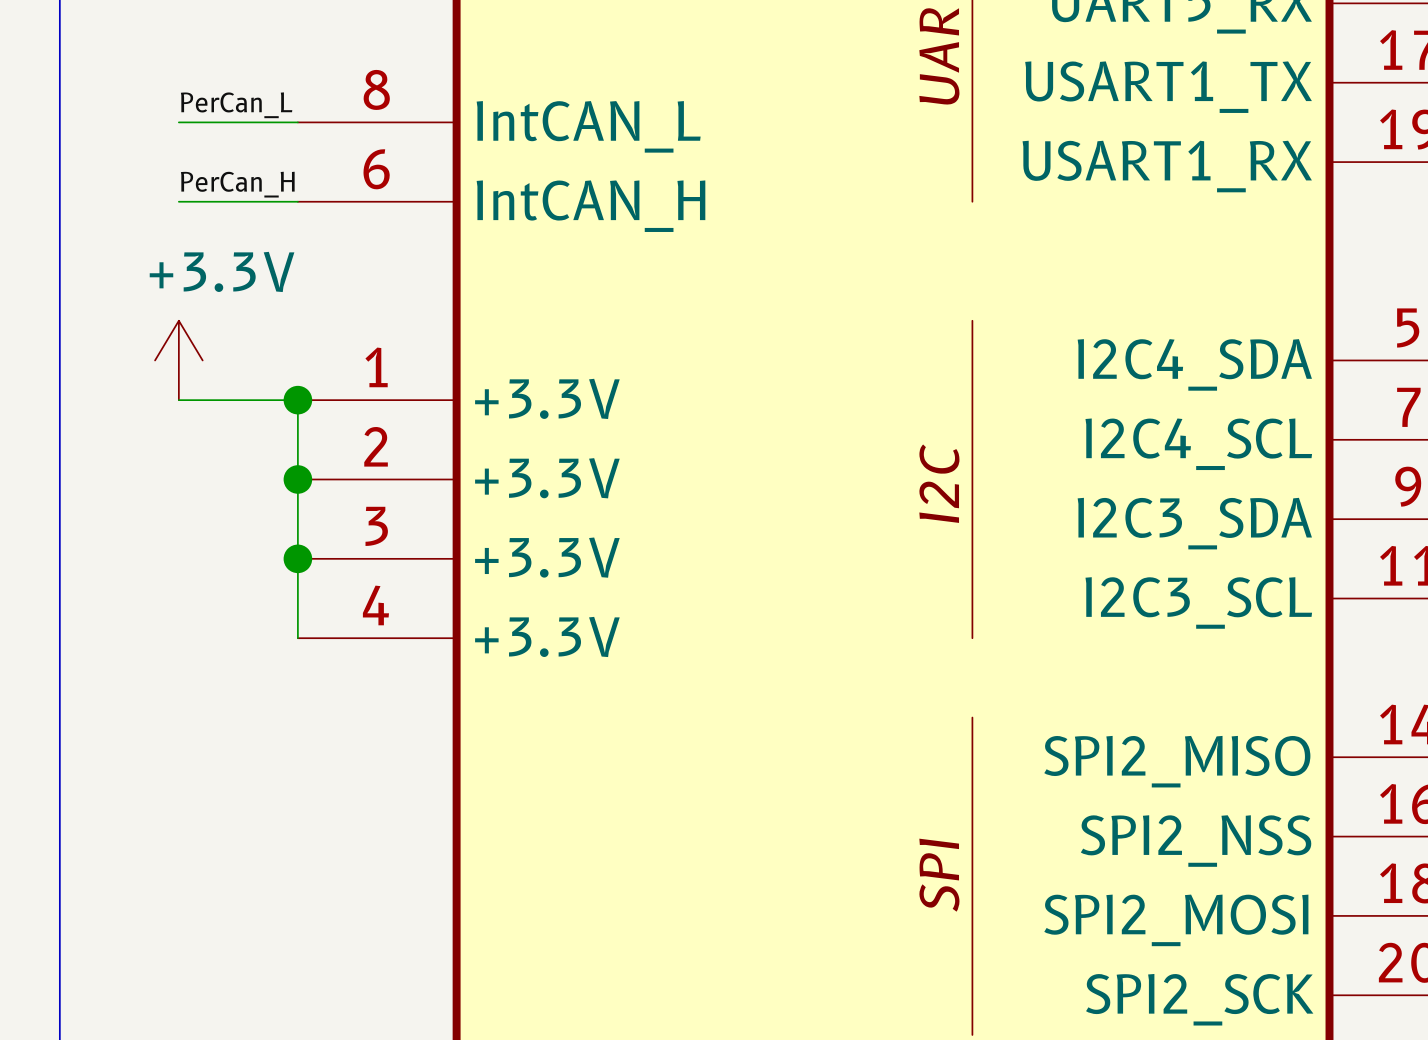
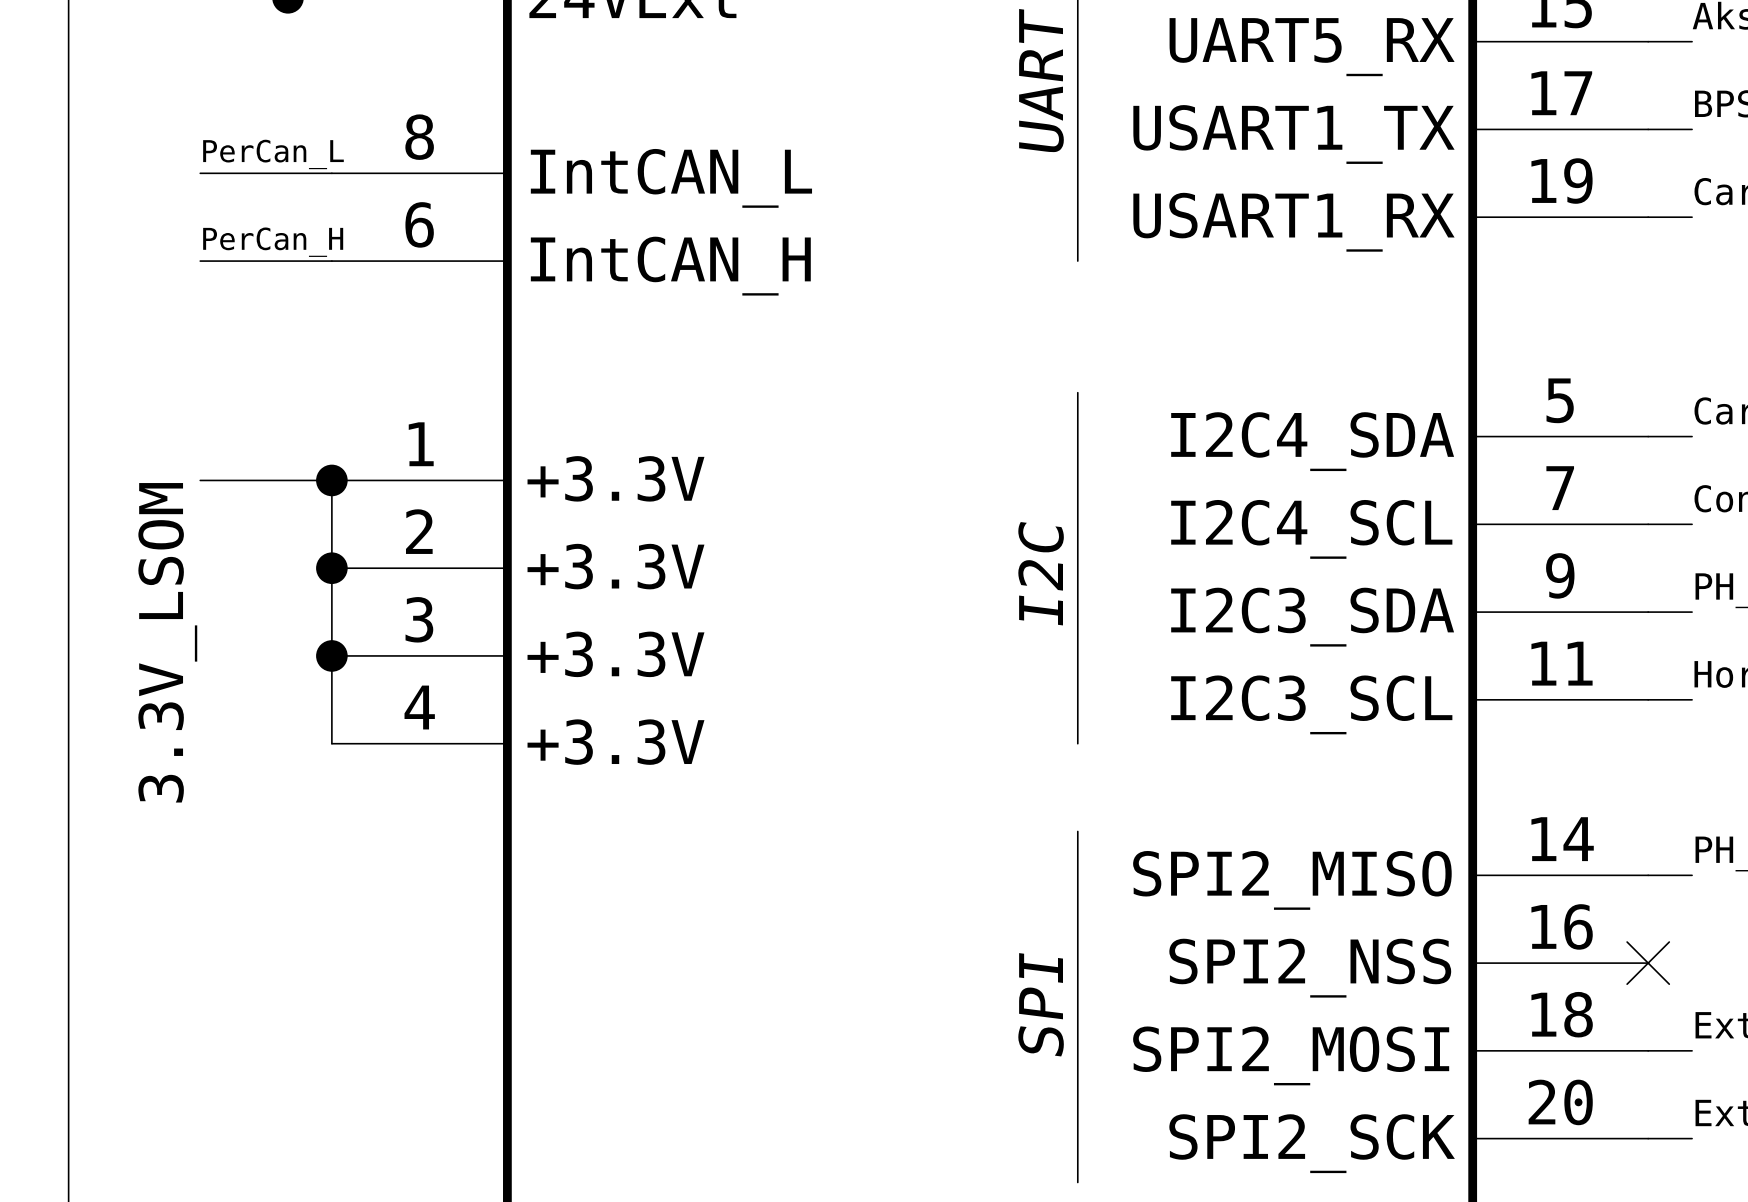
power symbol: +3.3V (178, 360) -> none
label: none -> 3.3V_LSOM (167, 642)

